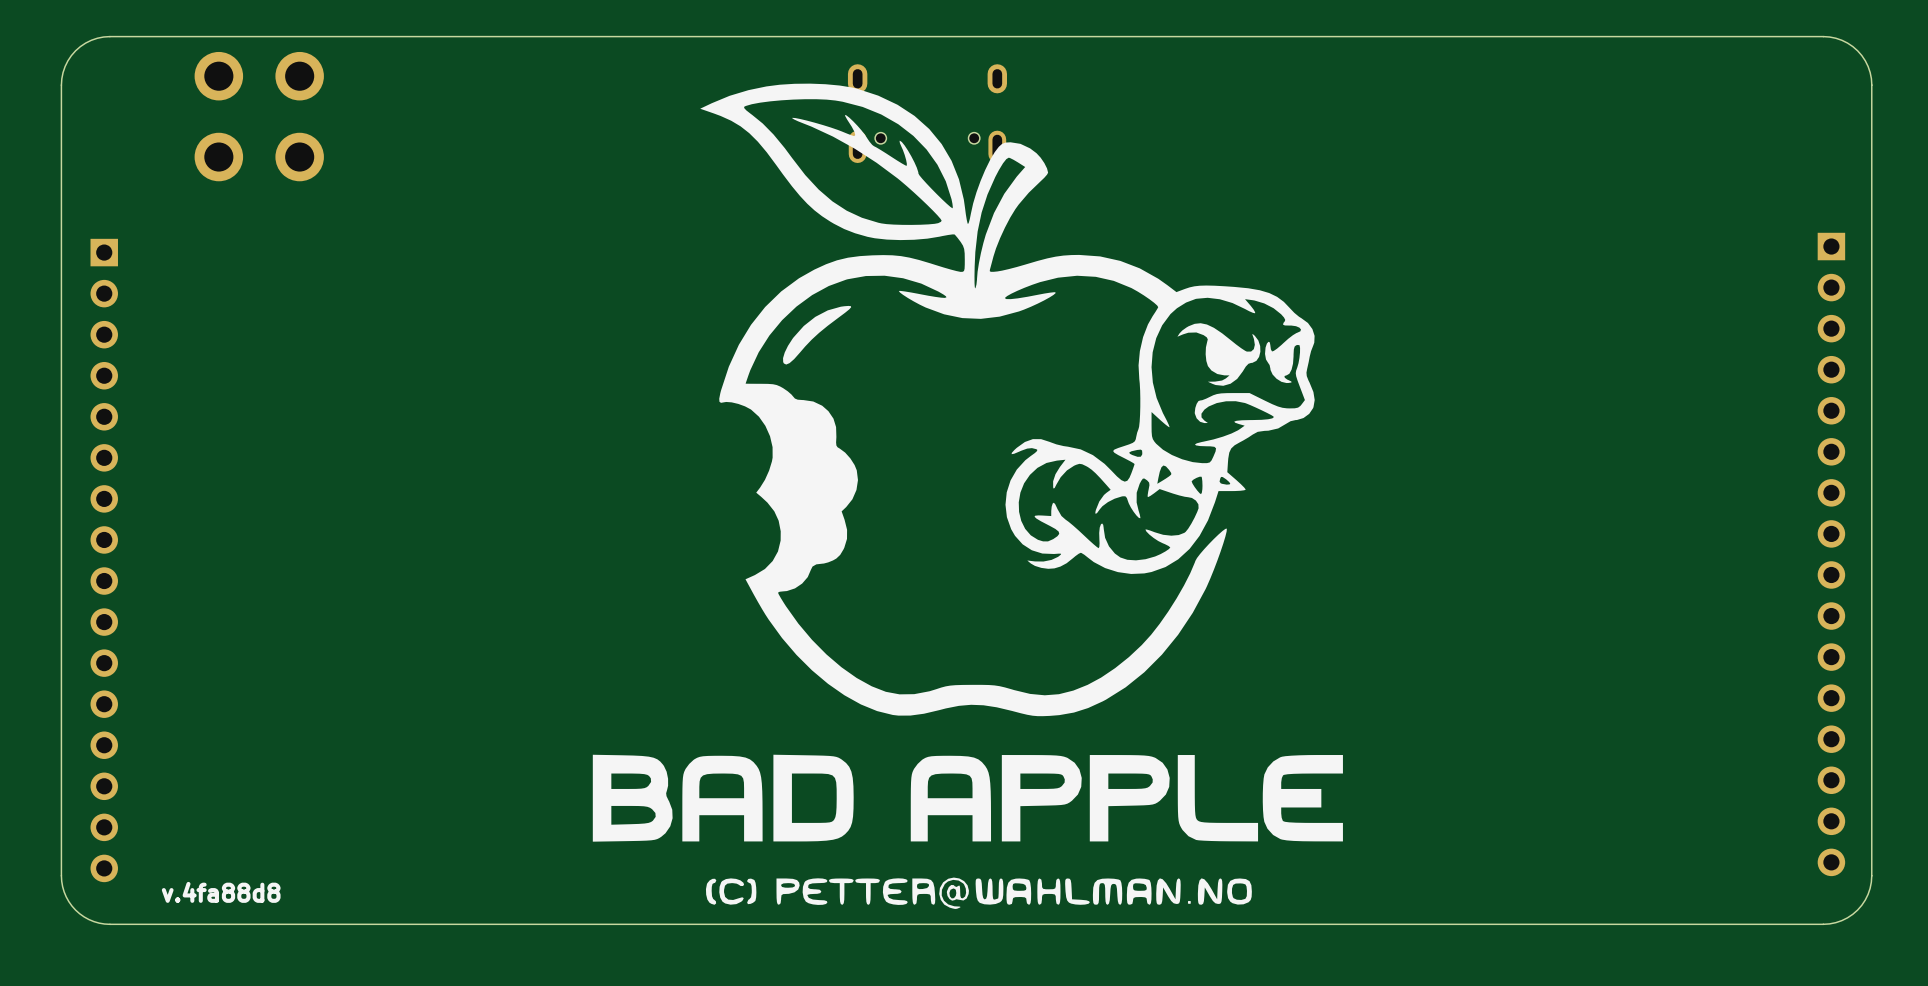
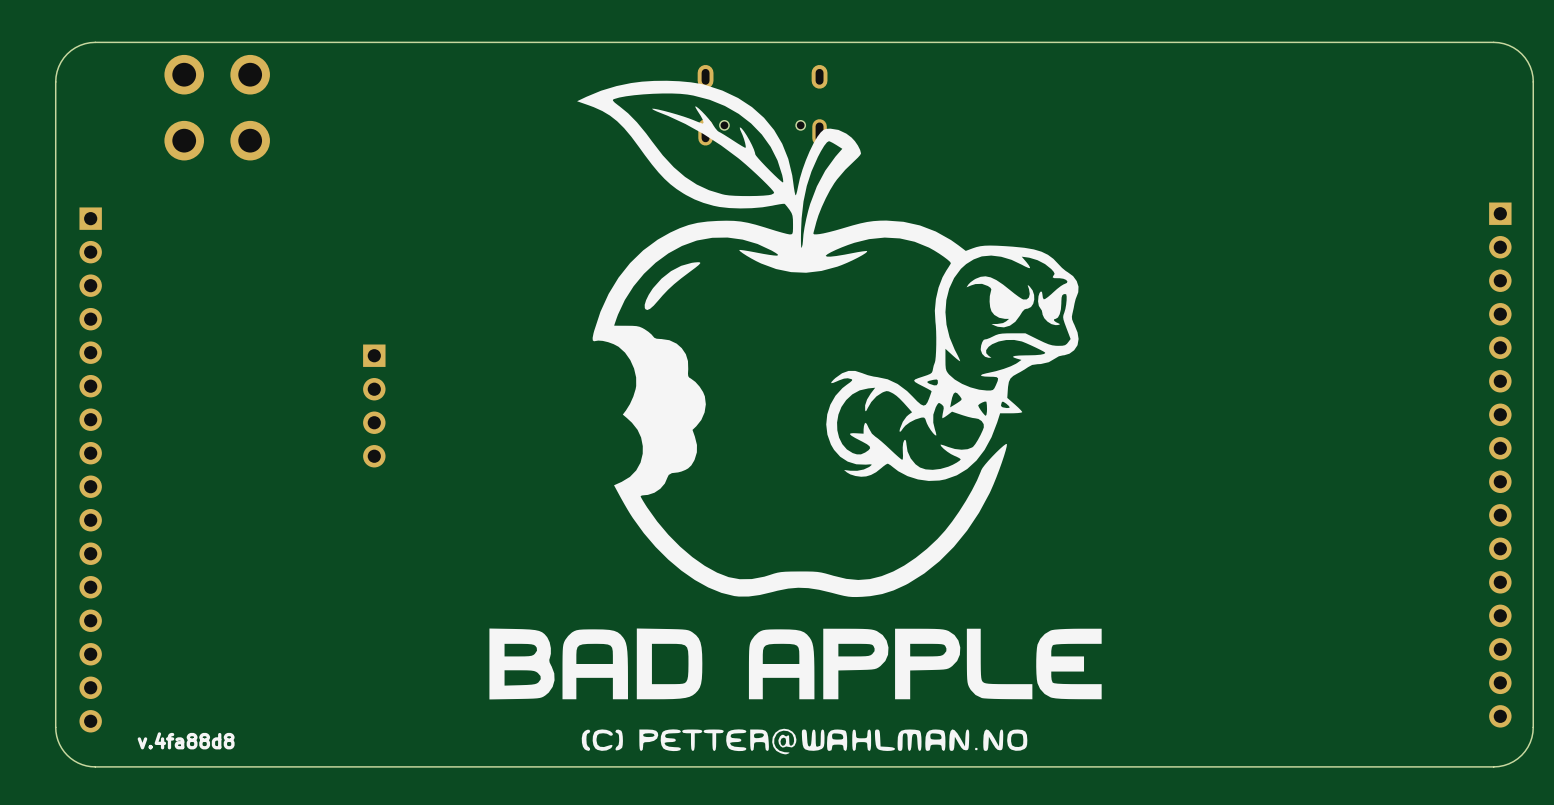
part: none -> (374, 405)

